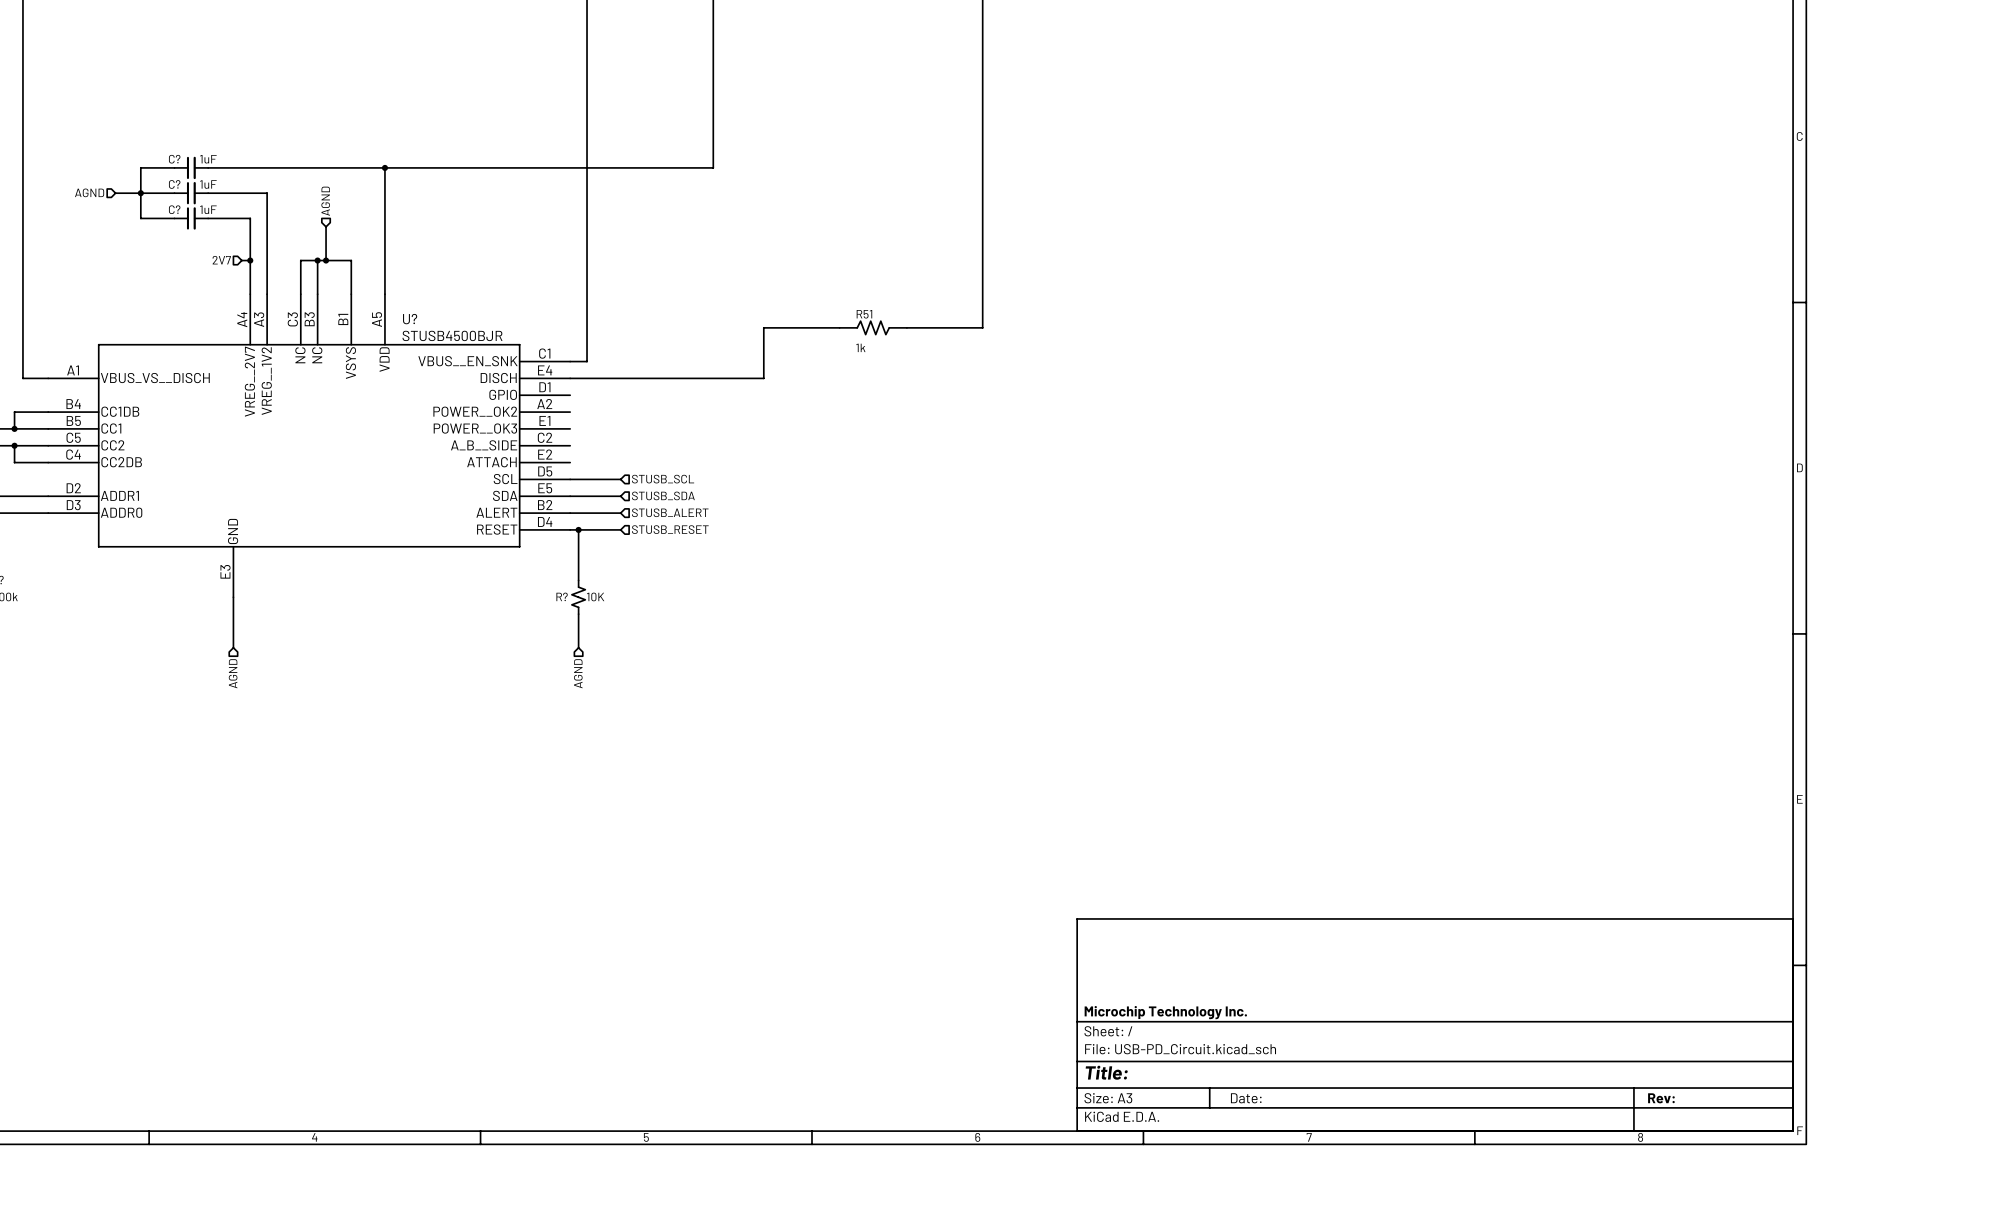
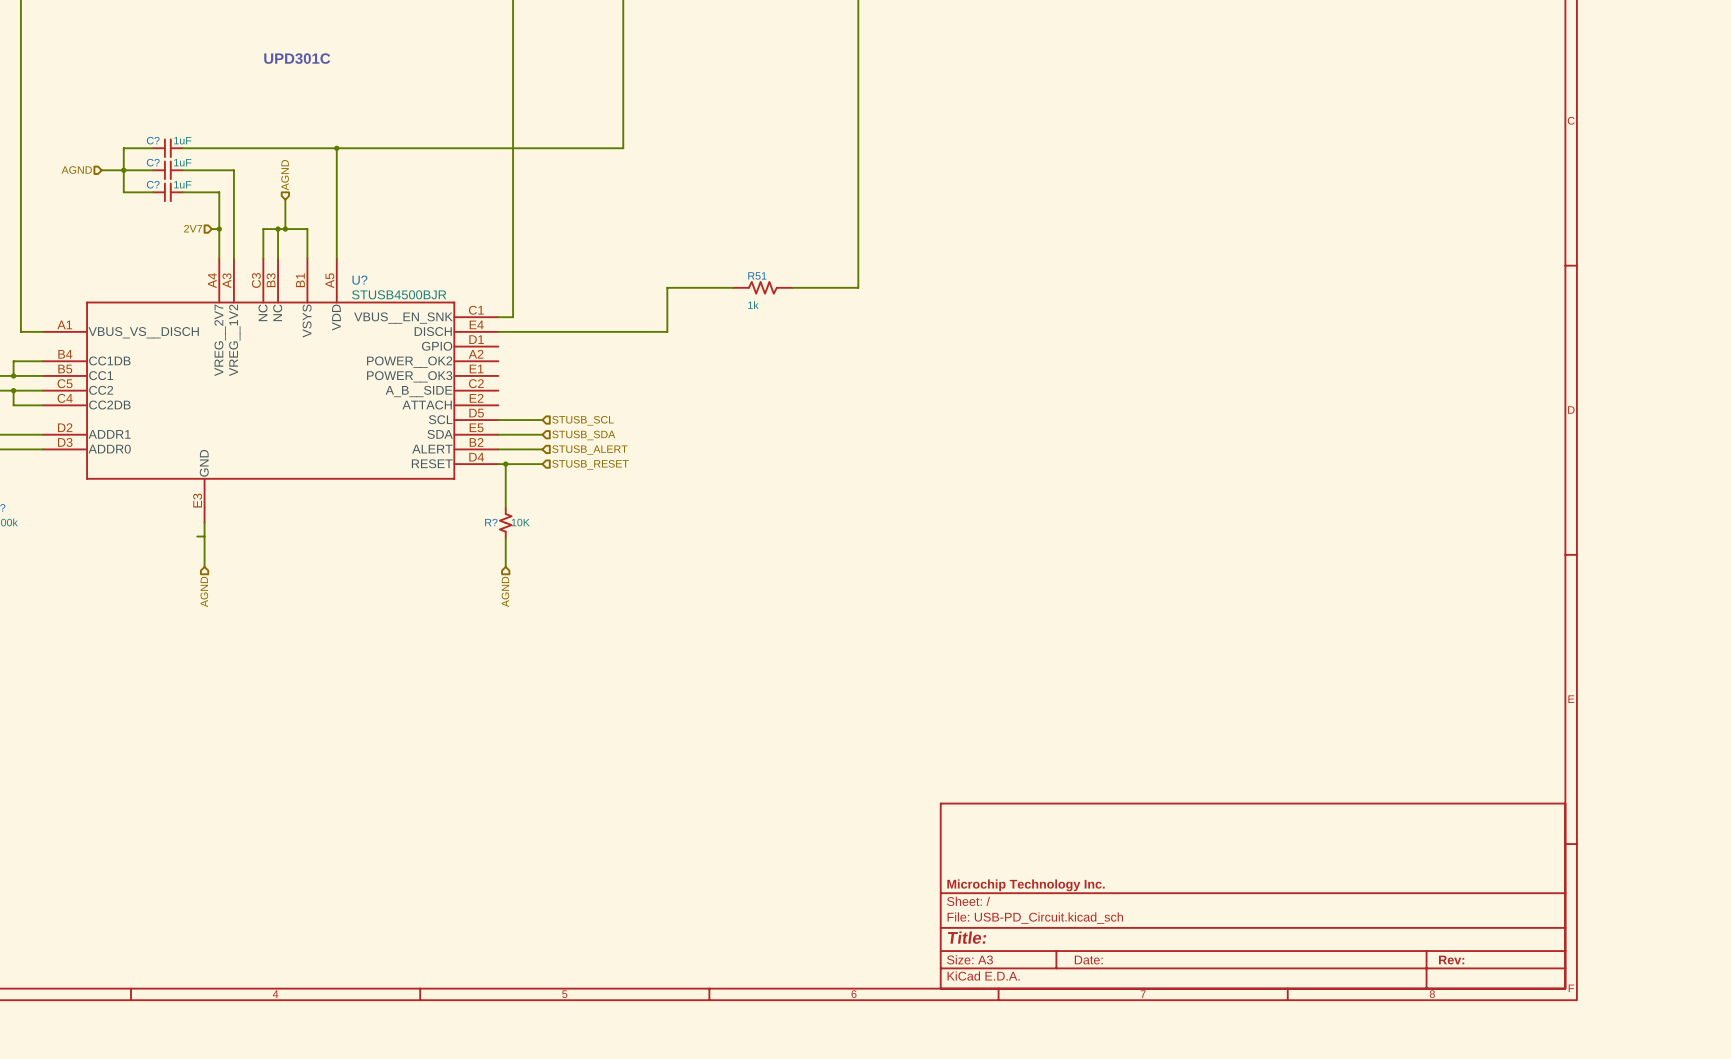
text: none -> UPD301C (297, 58)
wire: none -> (197, 536) (204, 536)

